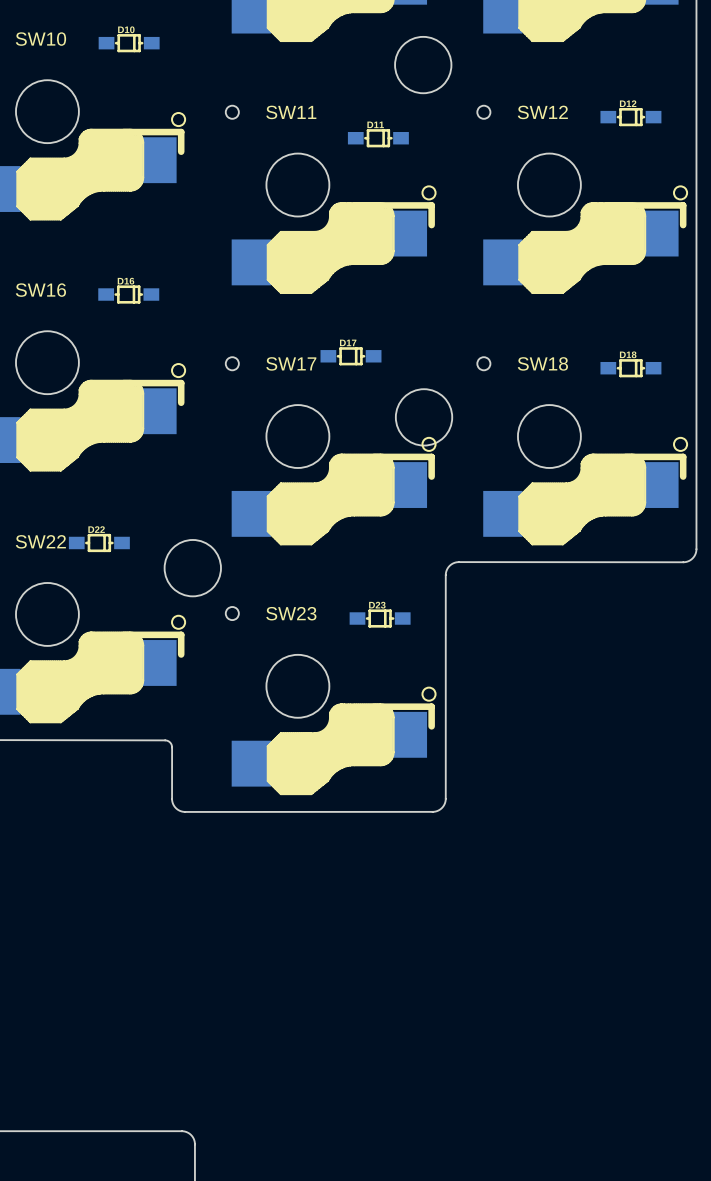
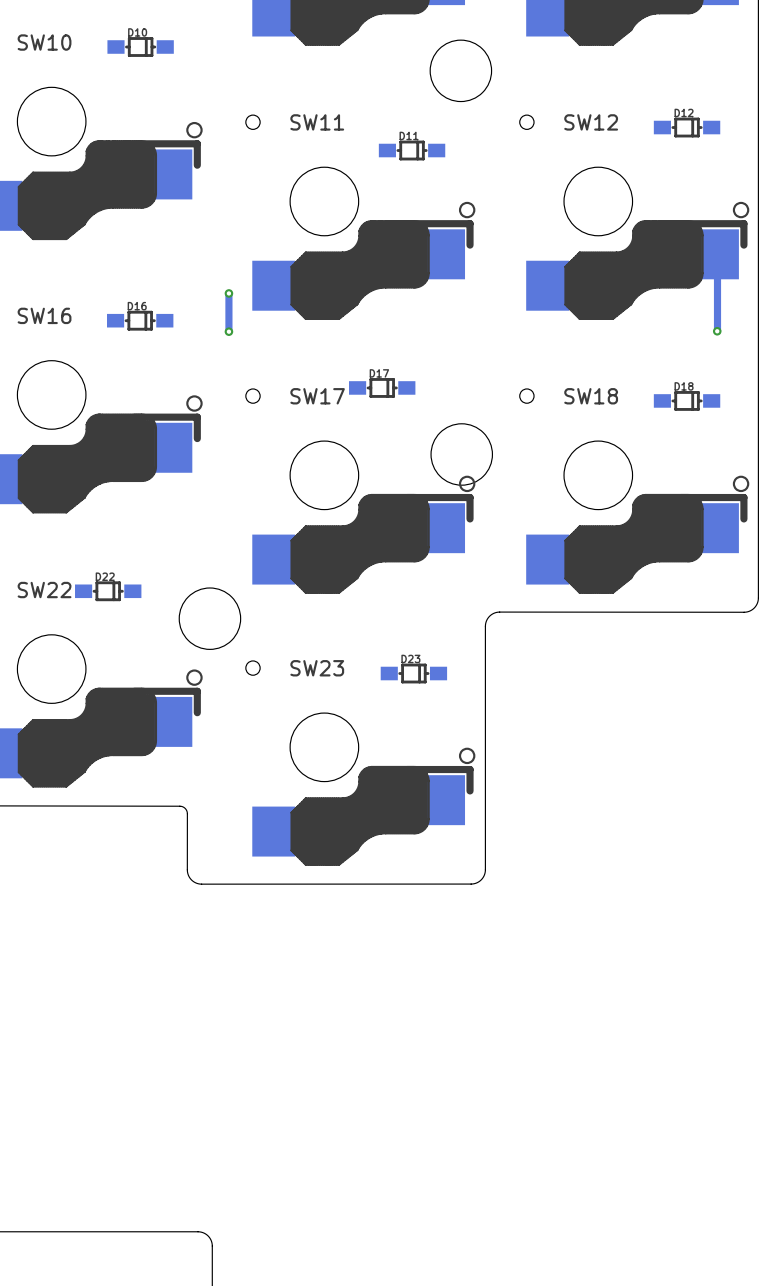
track: none -> (717, 254) (717, 331)
track: none -> (228, 293) (228, 331)
via: none -> (228, 293)
via: none -> (228, 331)
via: none -> (717, 331)

